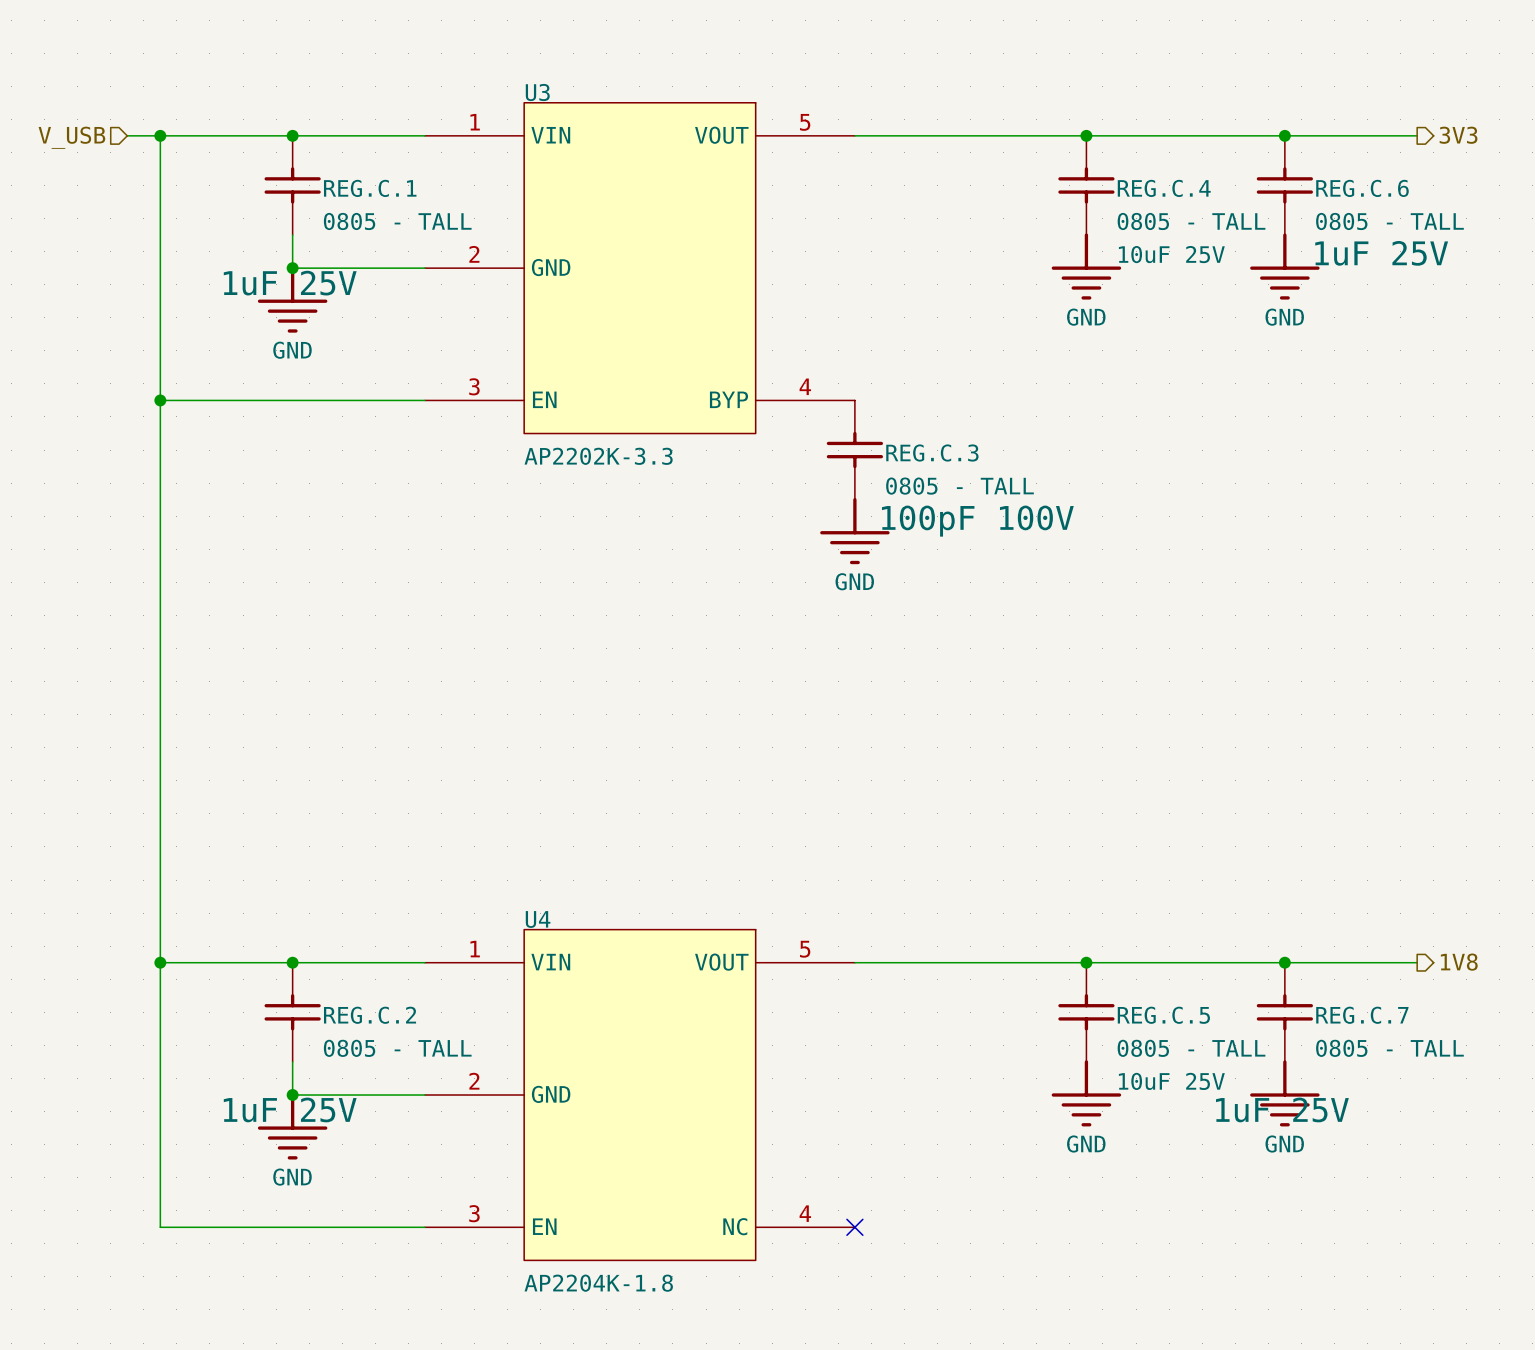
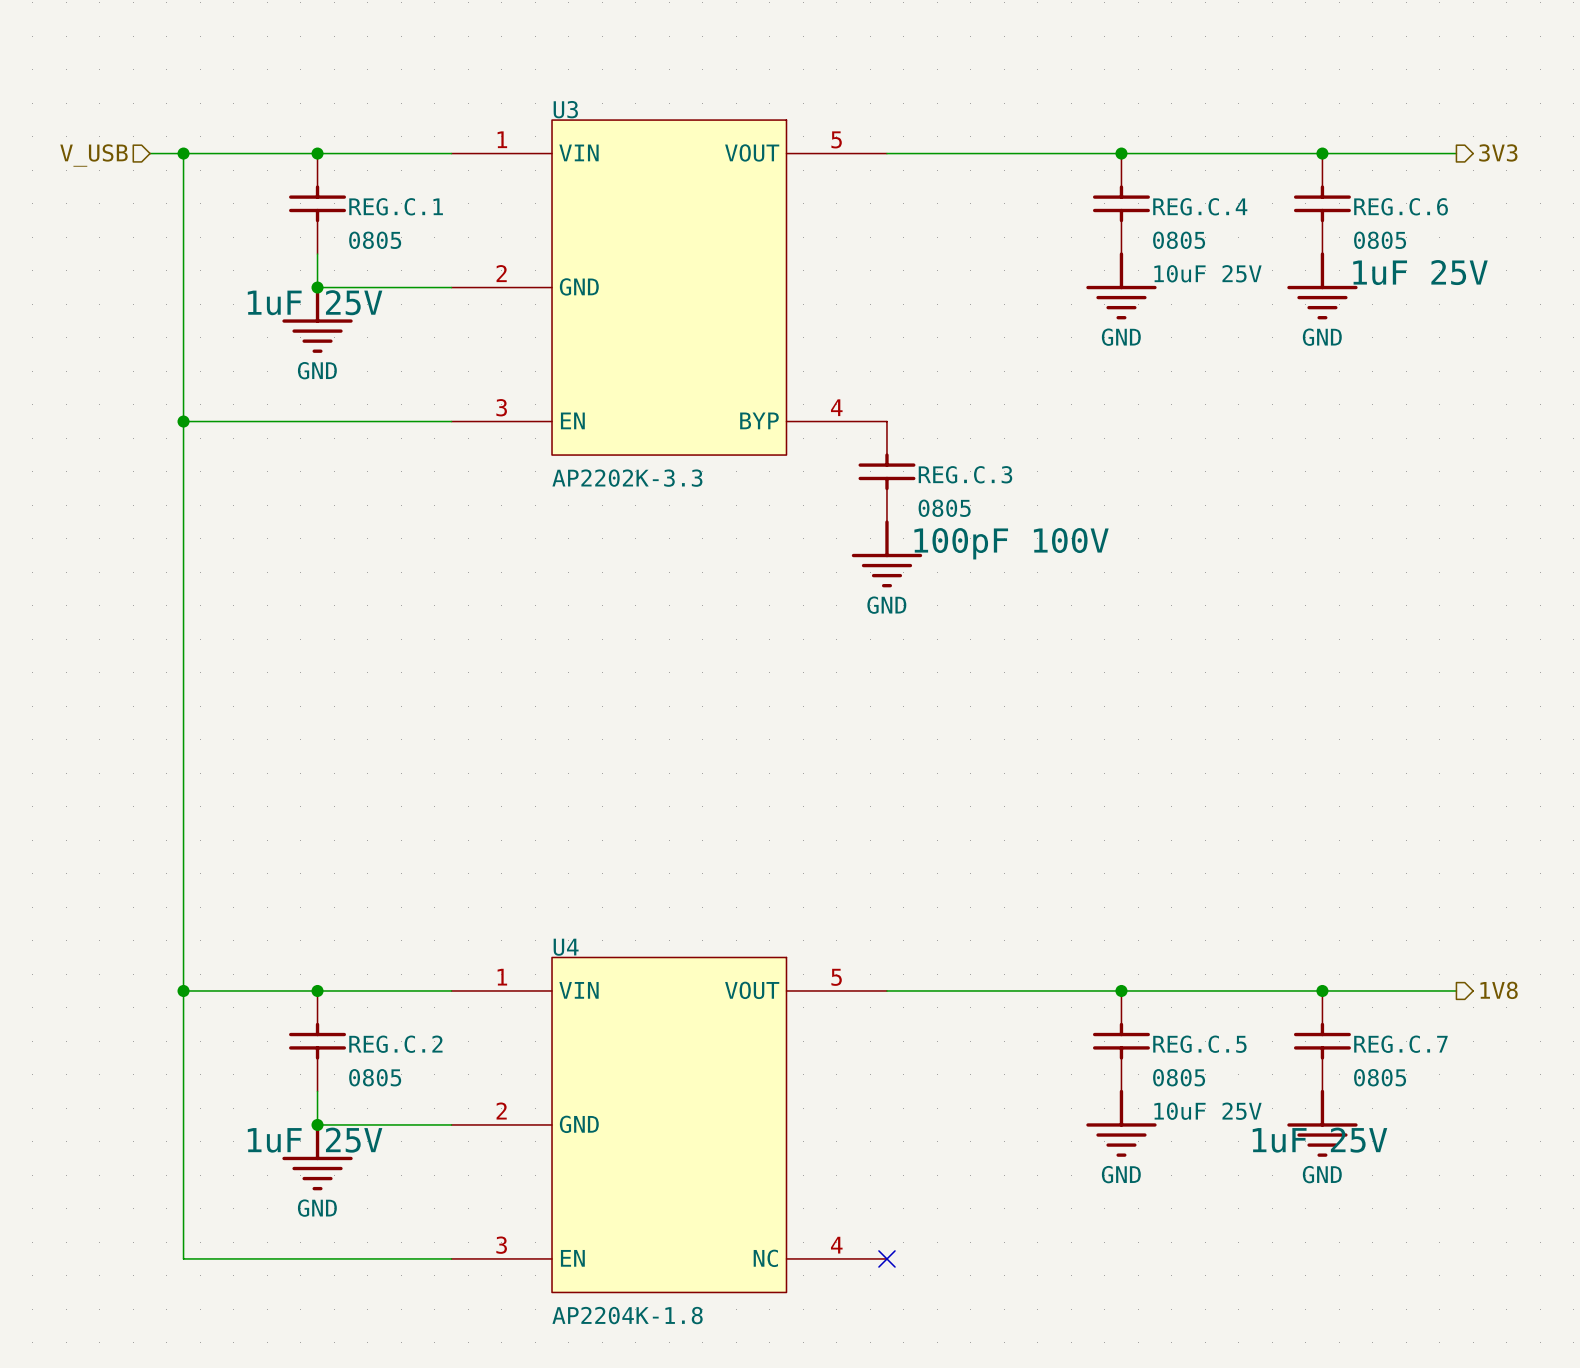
REG.C.1 value: 0805 - TALL (397, 221) -> 0805 (375, 240)
REG.C.4 value: 0805 - TALL (1191, 221) -> 0805 (1179, 240)
REG.C.6 value: 0805 - TALL (1389, 221) -> 0805 (1380, 240)
REG.C.3 value: 0805 - TALL (959, 486) -> 0805 (944, 508)
REG.C.2 value: 0805 - TALL (397, 1048) -> 0805 (375, 1077)
REG.C.5 value: 0805 - TALL (1191, 1048) -> 0805 (1179, 1077)
REG.C.7 value: 0805 - TALL (1389, 1048) -> 0805 (1380, 1077)

